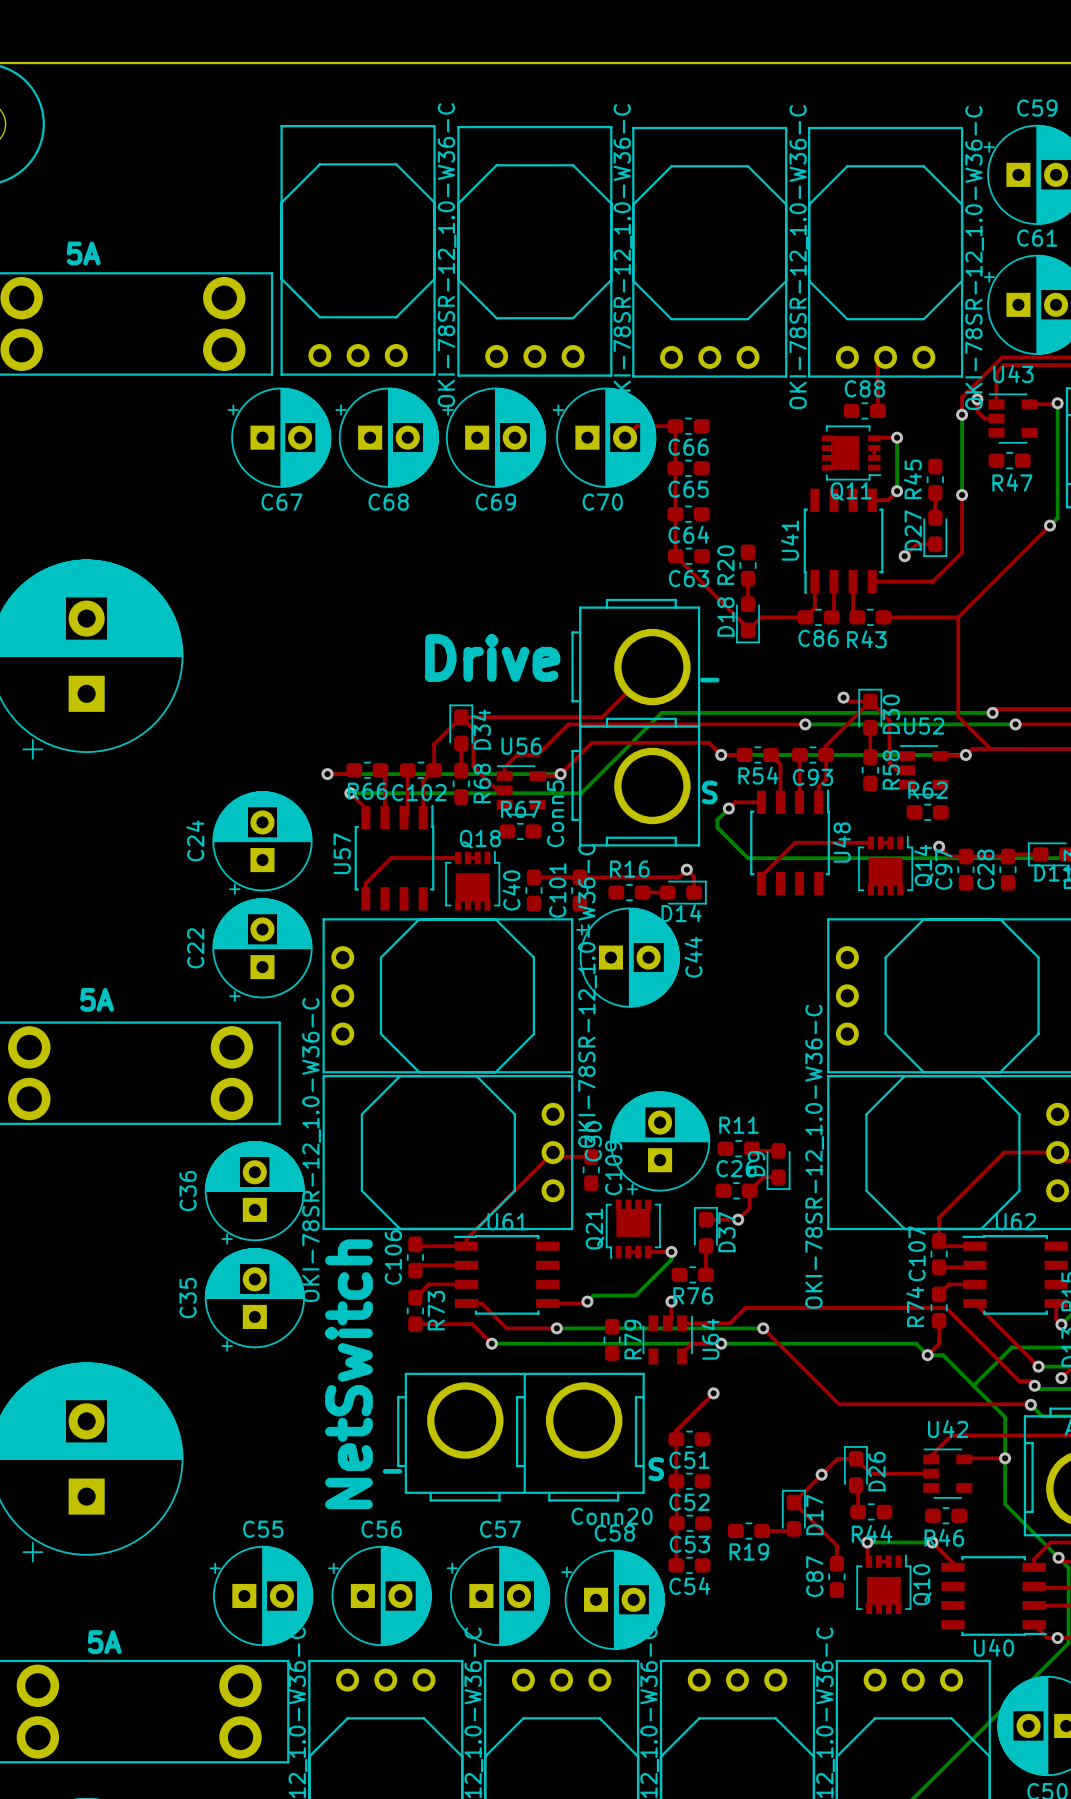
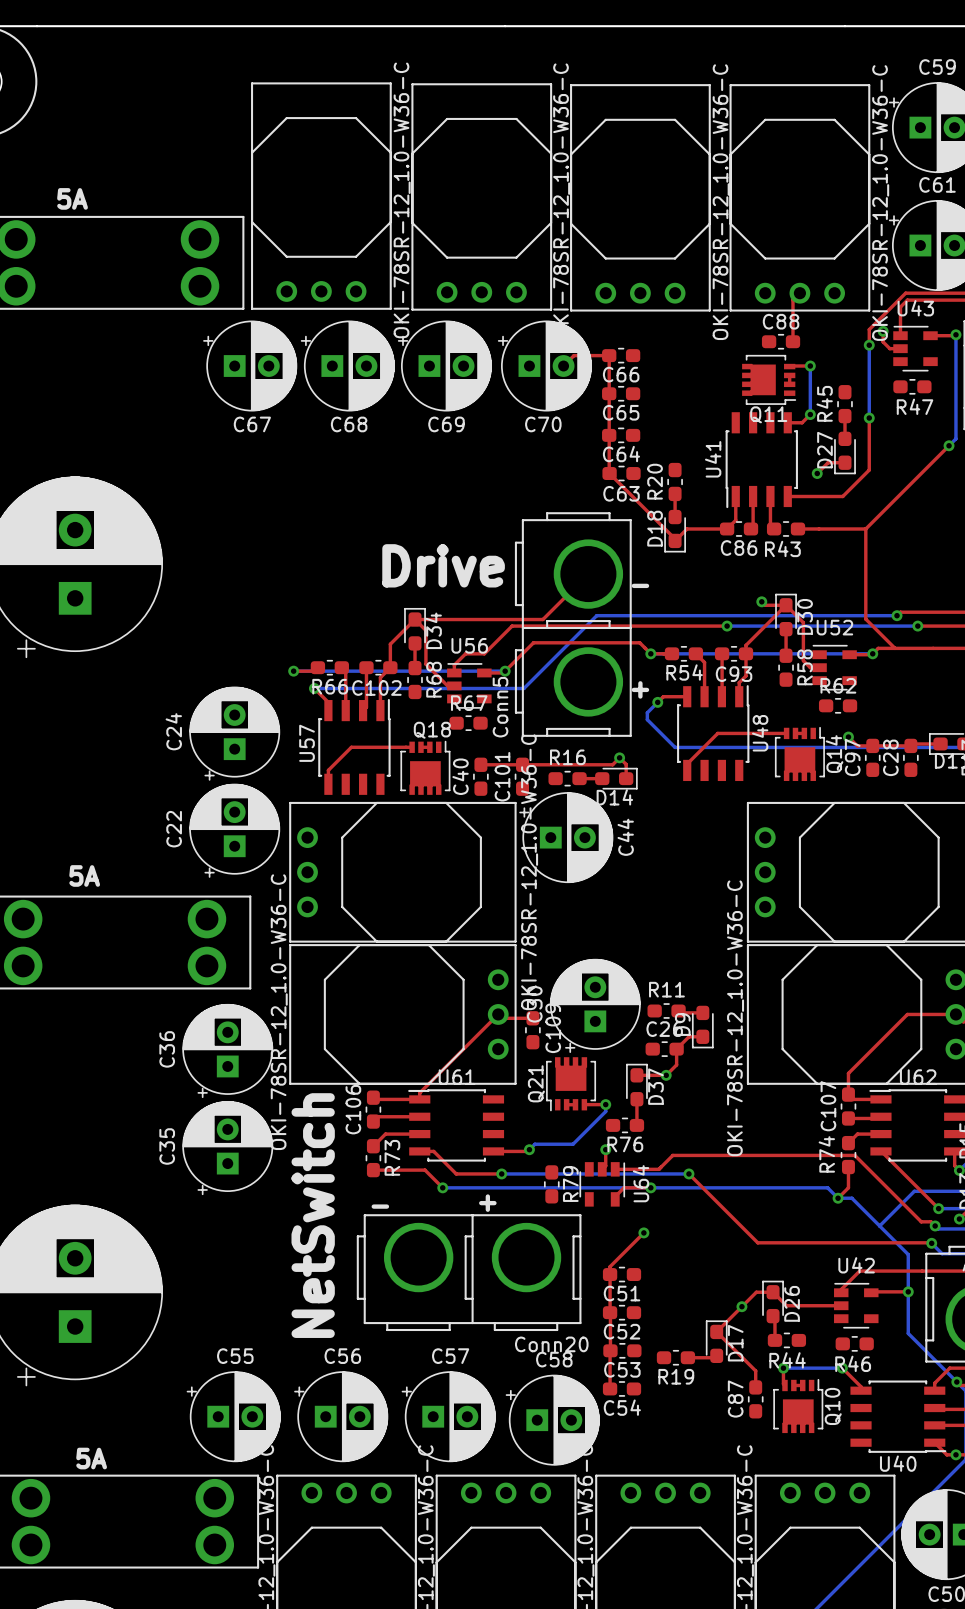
text: S (709, 792) -> + (640, 689)
text: none -> + (487, 1203)
text: S (656, 1469) -> none
text position: - (392, 1471) -> - (380, 1206)

